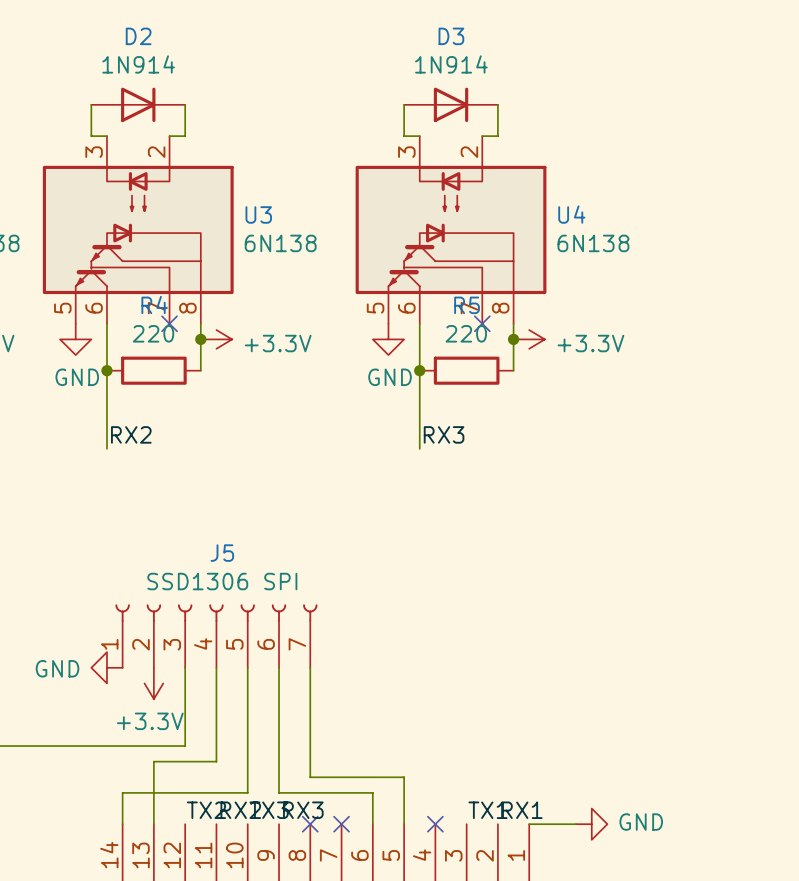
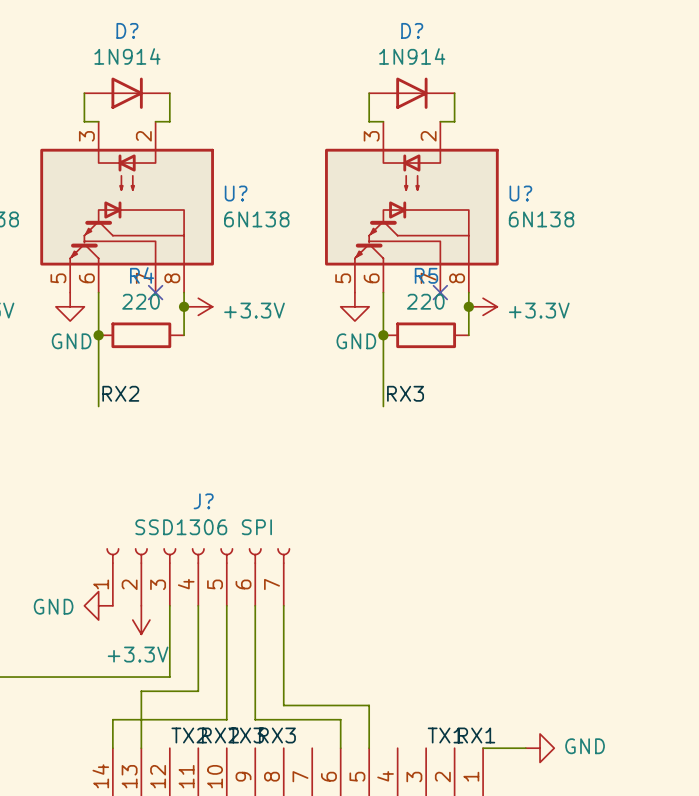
D2 name: D2 (138, 36) -> D? (127, 30)
D3 name: D3 (451, 36) -> D? (412, 30)
U3 name: U3 (258, 214) -> U? (236, 193)
U4 name: U4 (571, 214) -> U? (520, 193)
J5 name: J5 (222, 553) -> J? (203, 501)
no-connect mark: (310, 824) -> none
no-connect mark: (341, 824) -> none
no-connect mark: (435, 824) -> none

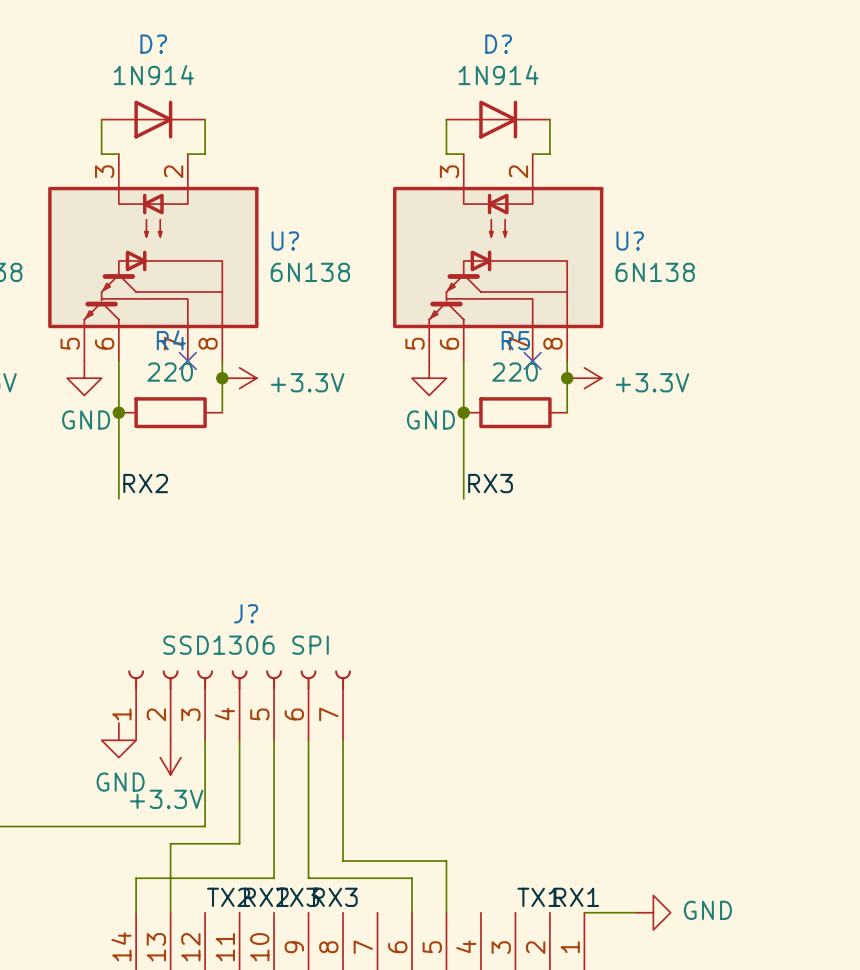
power symbol rotation: 0° (98, 605) -> 90° counterclockwise (118, 740)

